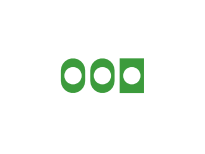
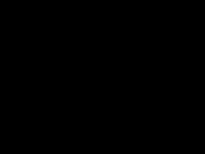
part: (102, 75) -> none

